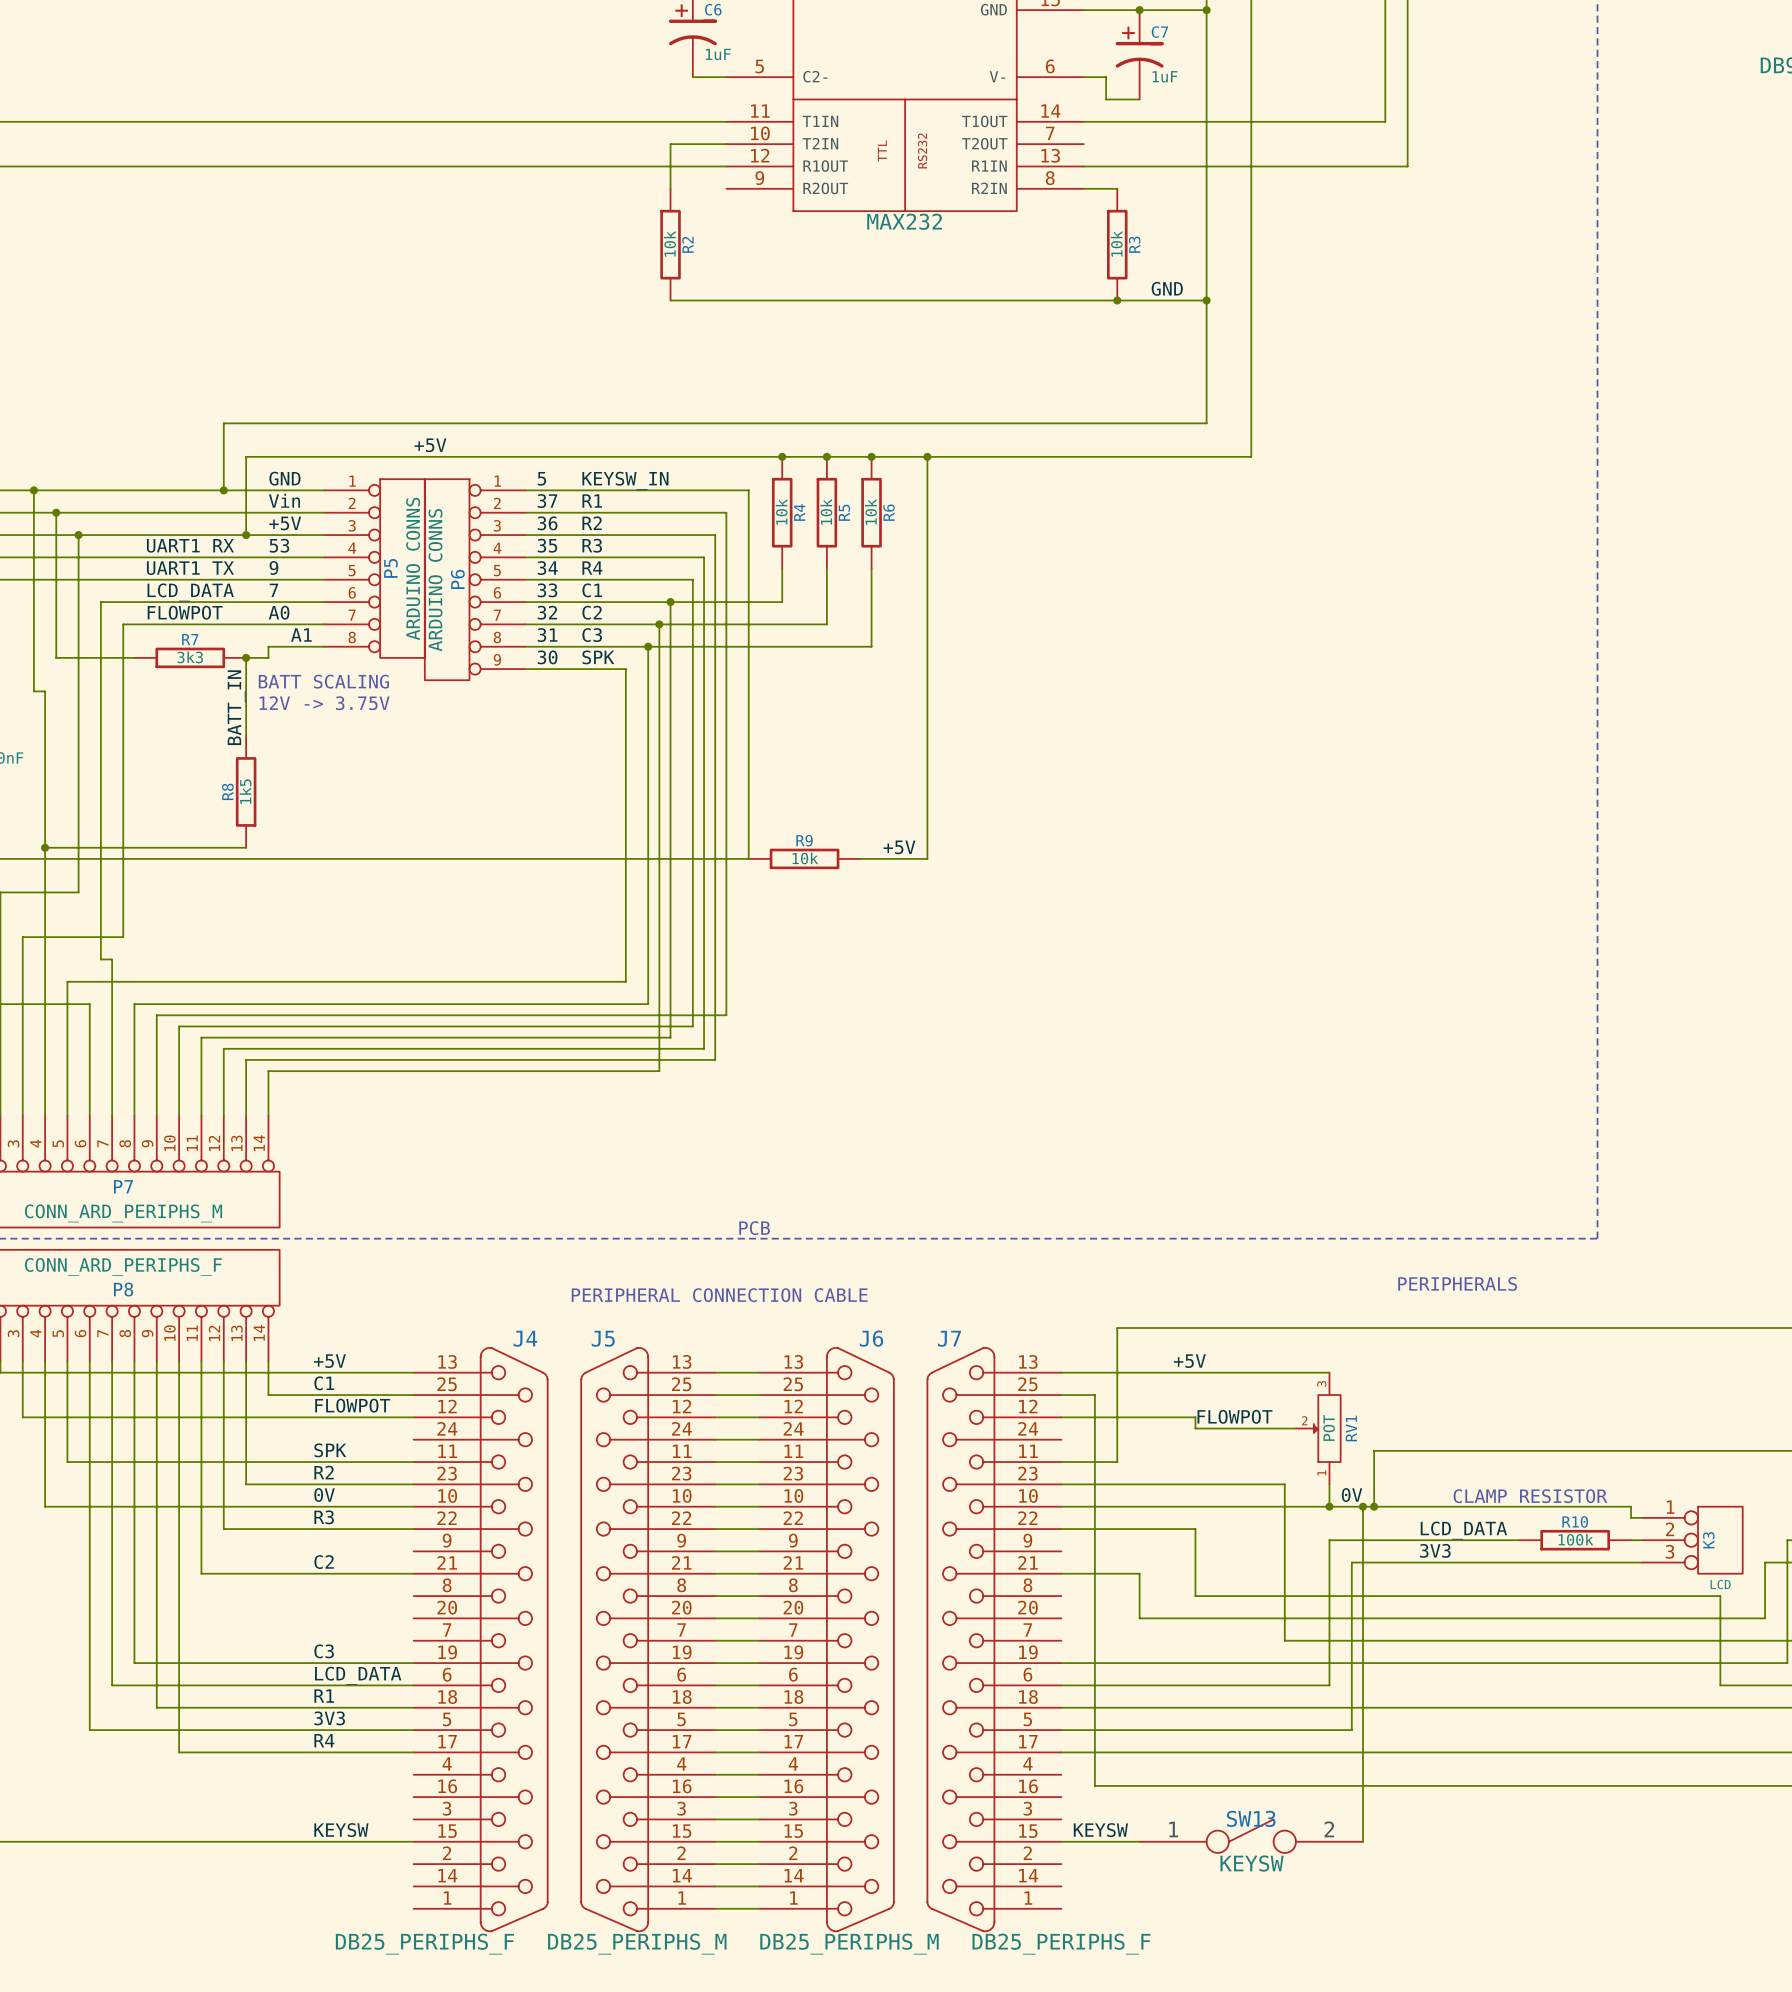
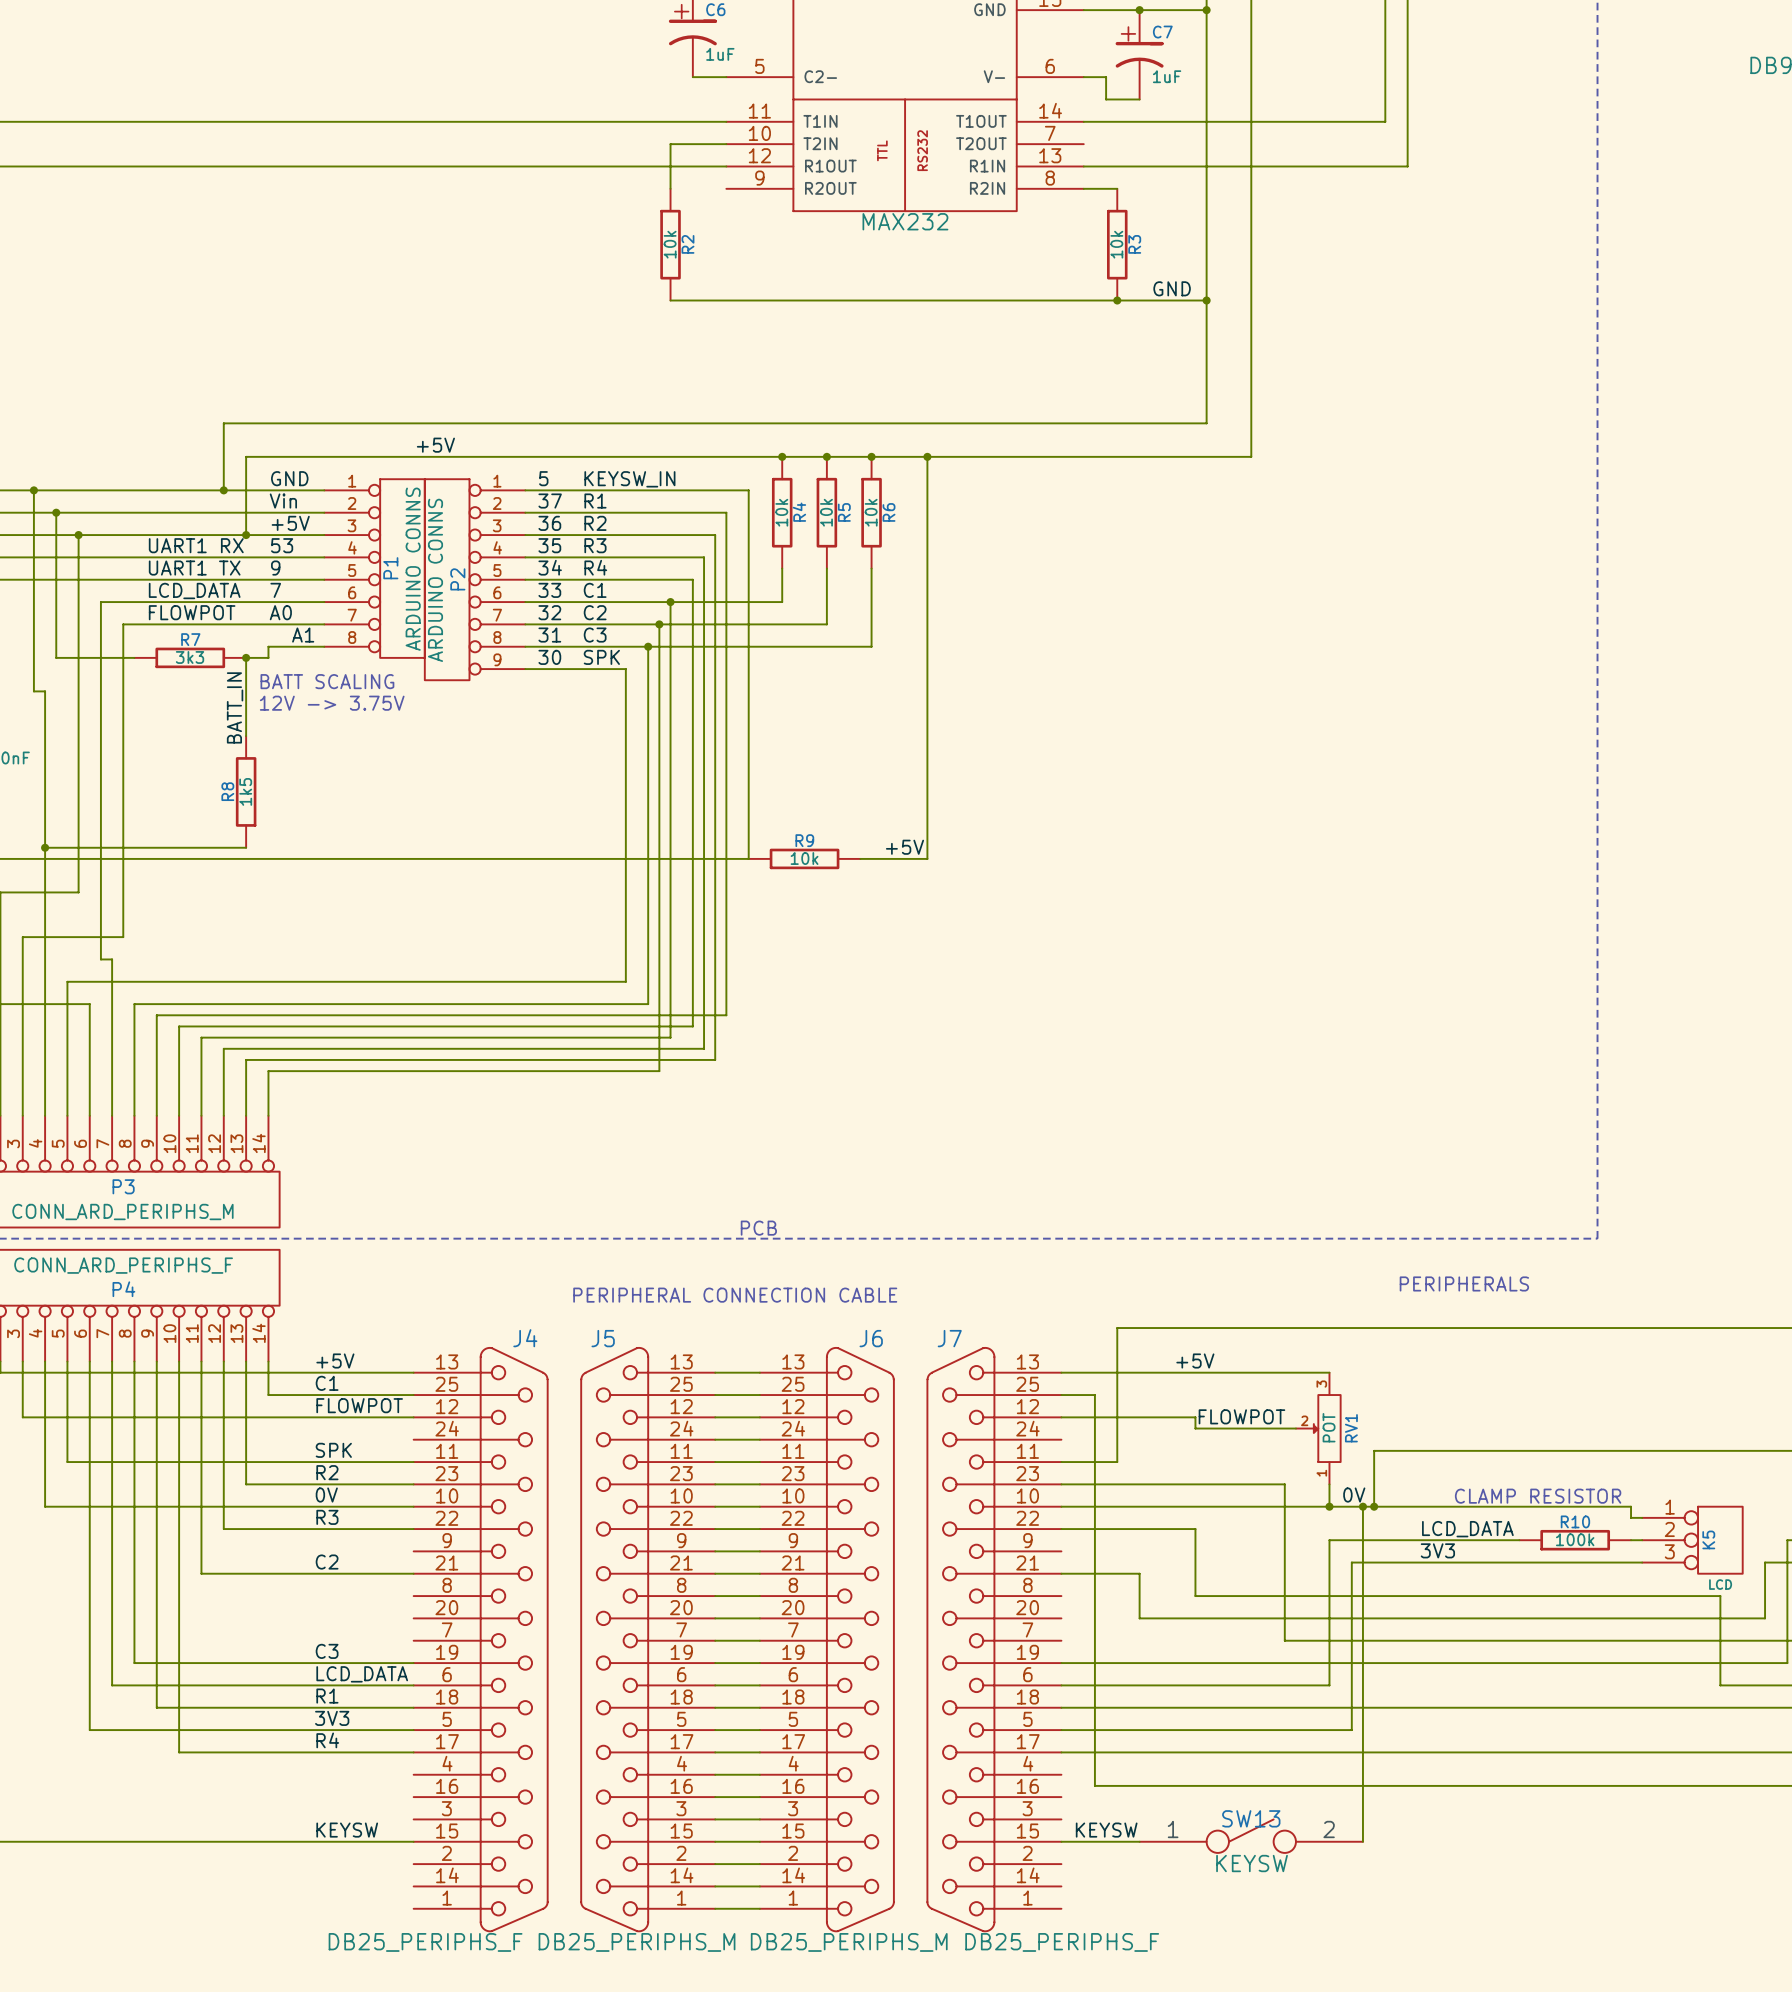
P5 name: P5 (390, 568) -> P1 (390, 568)
P6 name: P6 (457, 579) -> P2 (457, 579)
P7 name: P7 (123, 1186) -> P3 (123, 1186)
P8 name: P8 (123, 1289) -> P4 (123, 1289)
K3 name: K3 (1708, 1540) -> K5 (1708, 1539)

